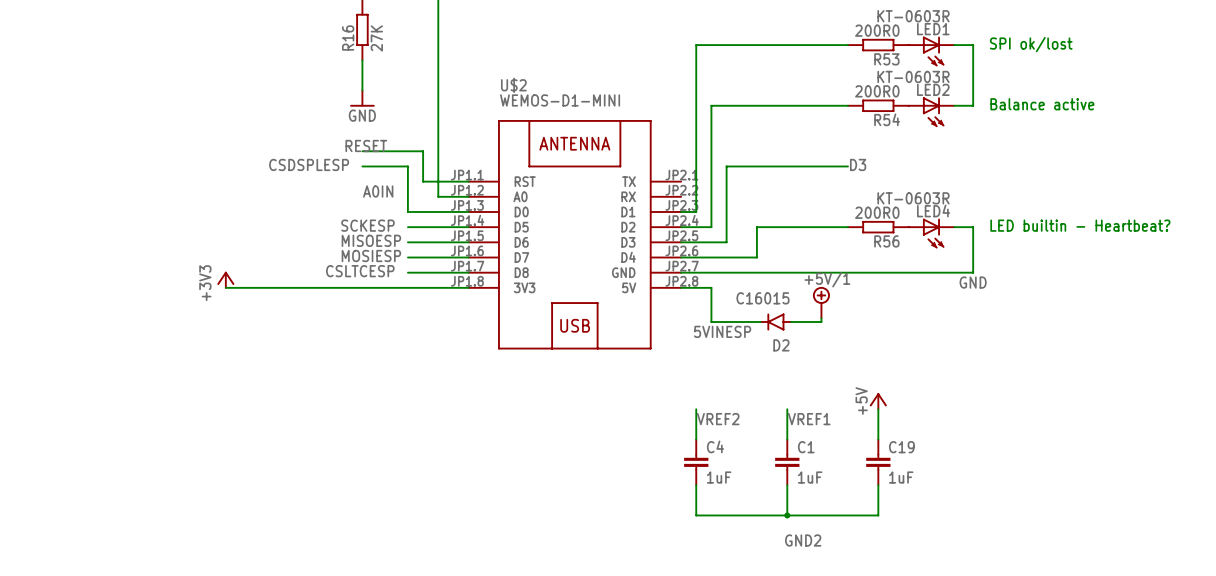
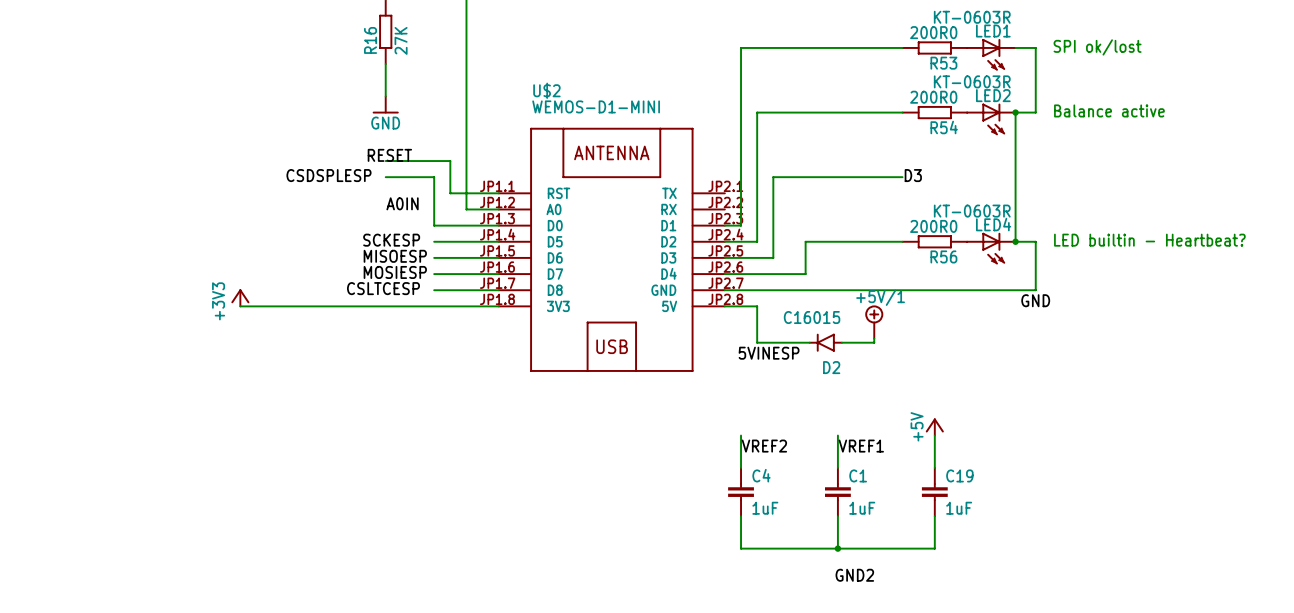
wire: none -> (1015, 112) (1015, 241)
junction: none -> (1015, 112)
junction: none -> (1015, 241)

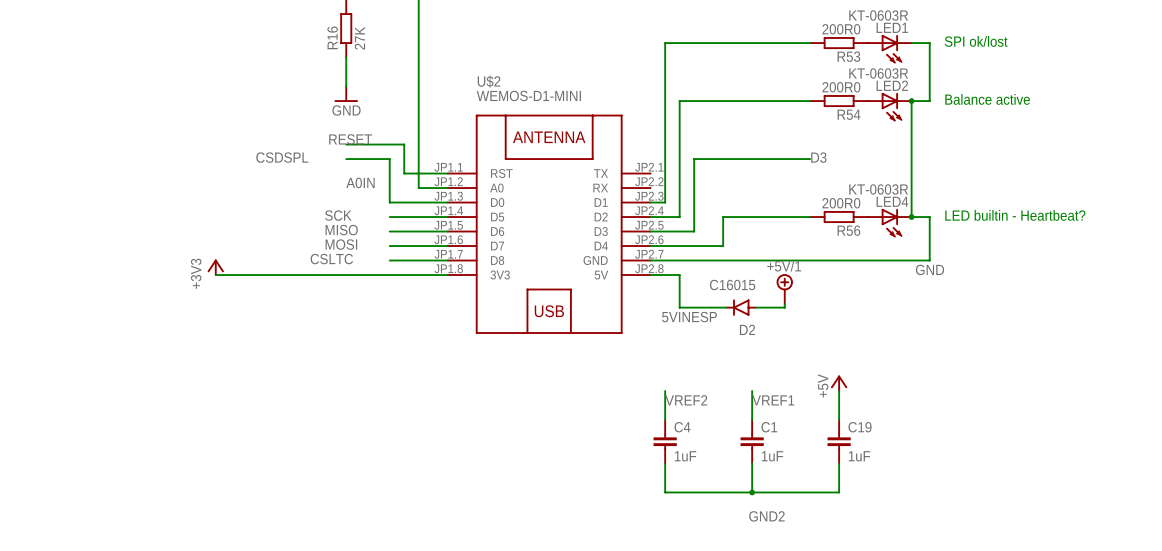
label: CSDSPLESP (328, 175) -> CSDSPL (282, 157)
label: SCKESP (391, 240) -> SCK (338, 215)
label: MISOESP (395, 256) -> MISO (341, 230)
label: MOSIESP (395, 272) -> MOSI (341, 244)
label: CSLTCESP (383, 288) -> CSLTC (331, 259)

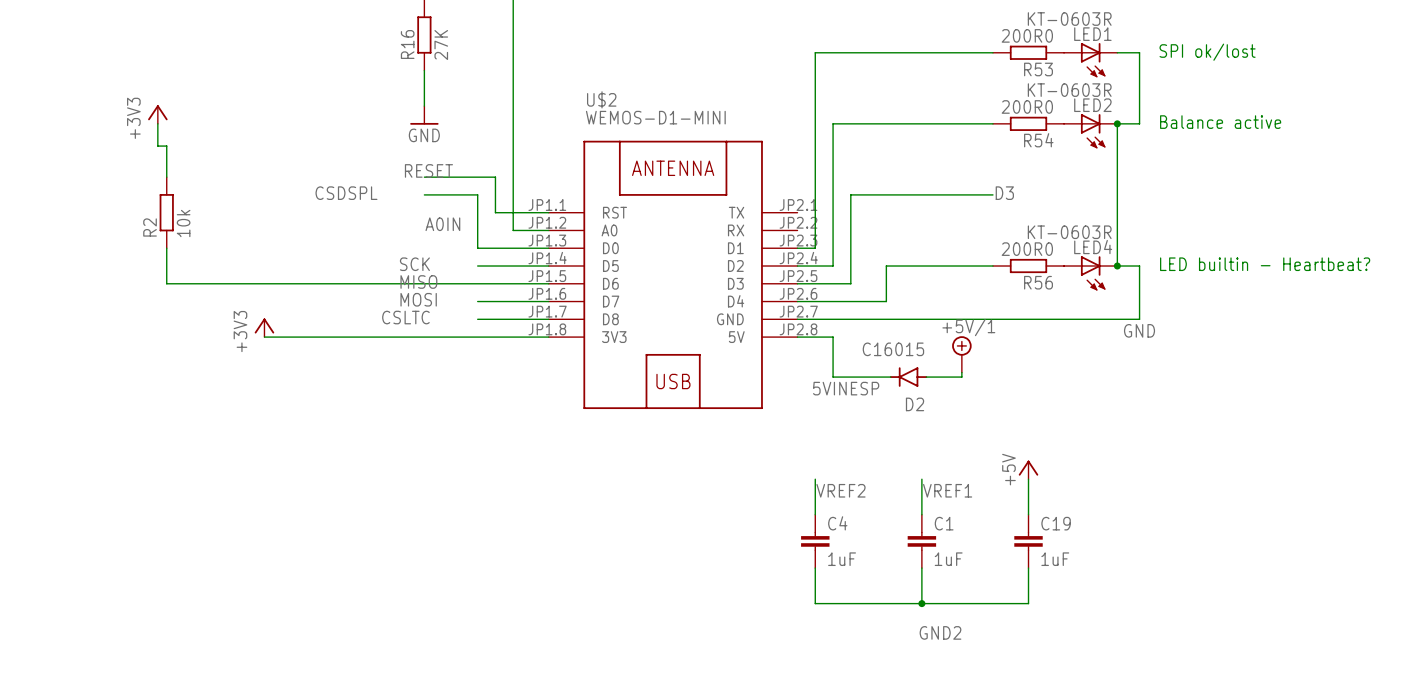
power symbol: none -> +3V3 (157, 114)
wire: none -> (157, 123) (157, 146) (166, 146) (166, 177)
R2: none -> 10k (166, 212)
wire: none -> (166, 248) (166, 283) (477, 283)

